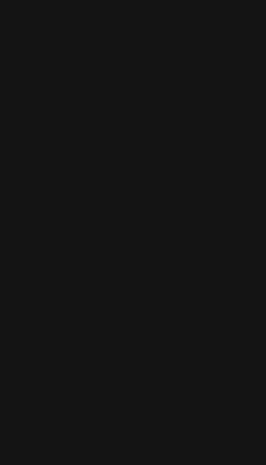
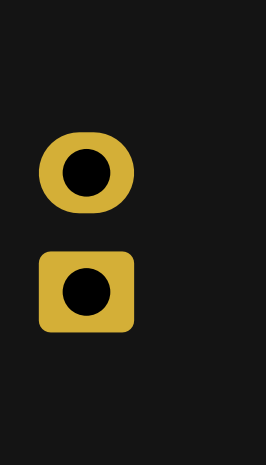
part: none -> (86, 232)

